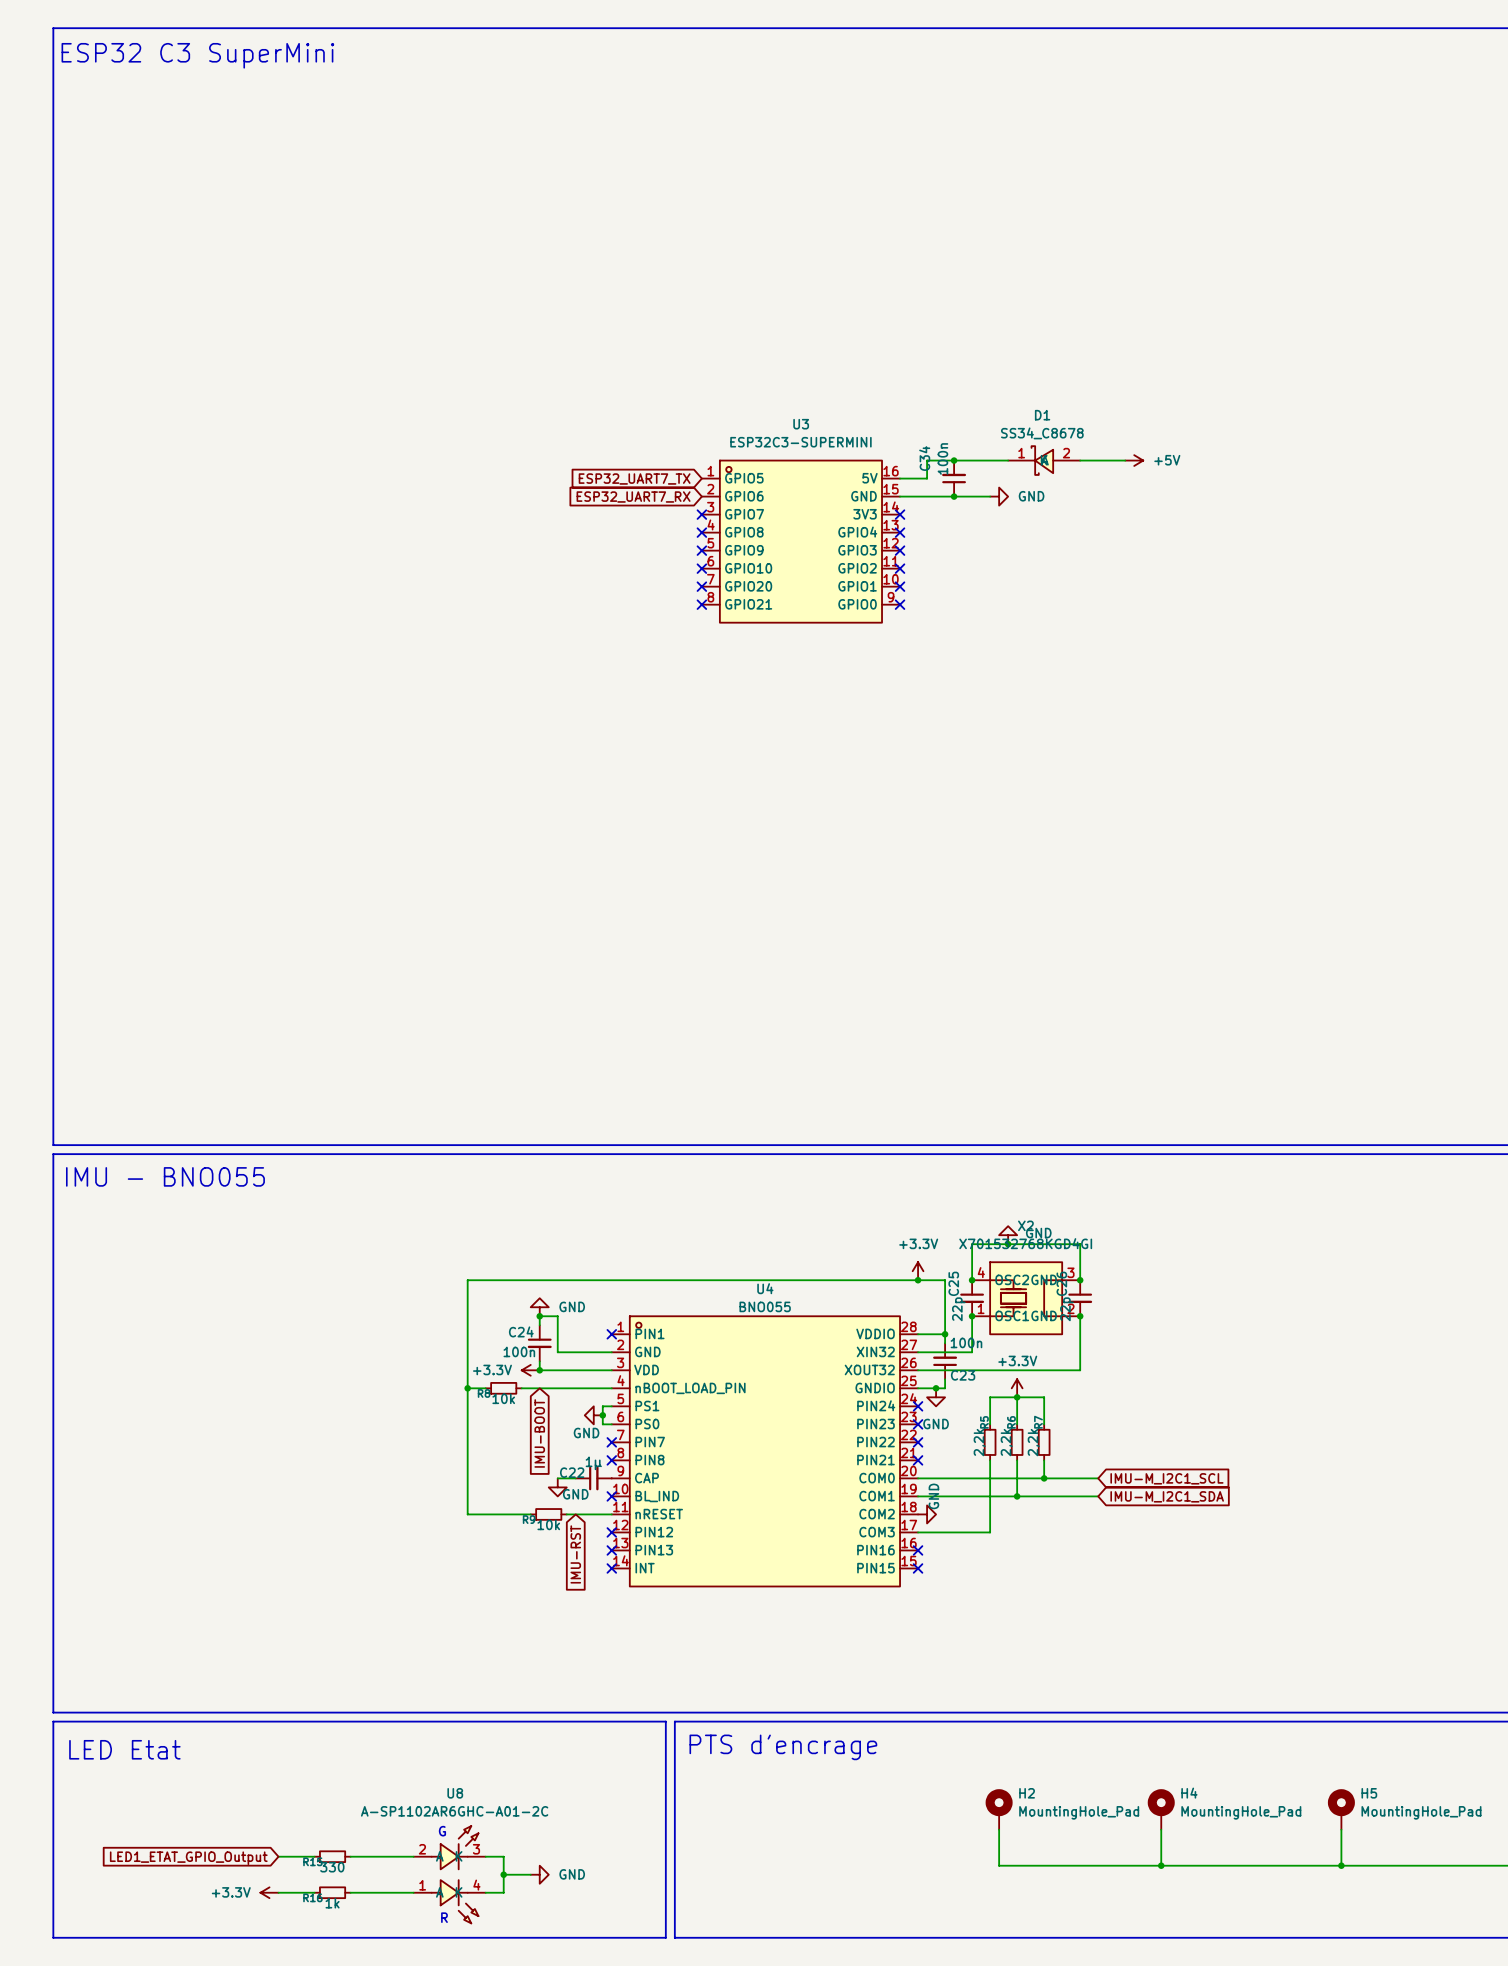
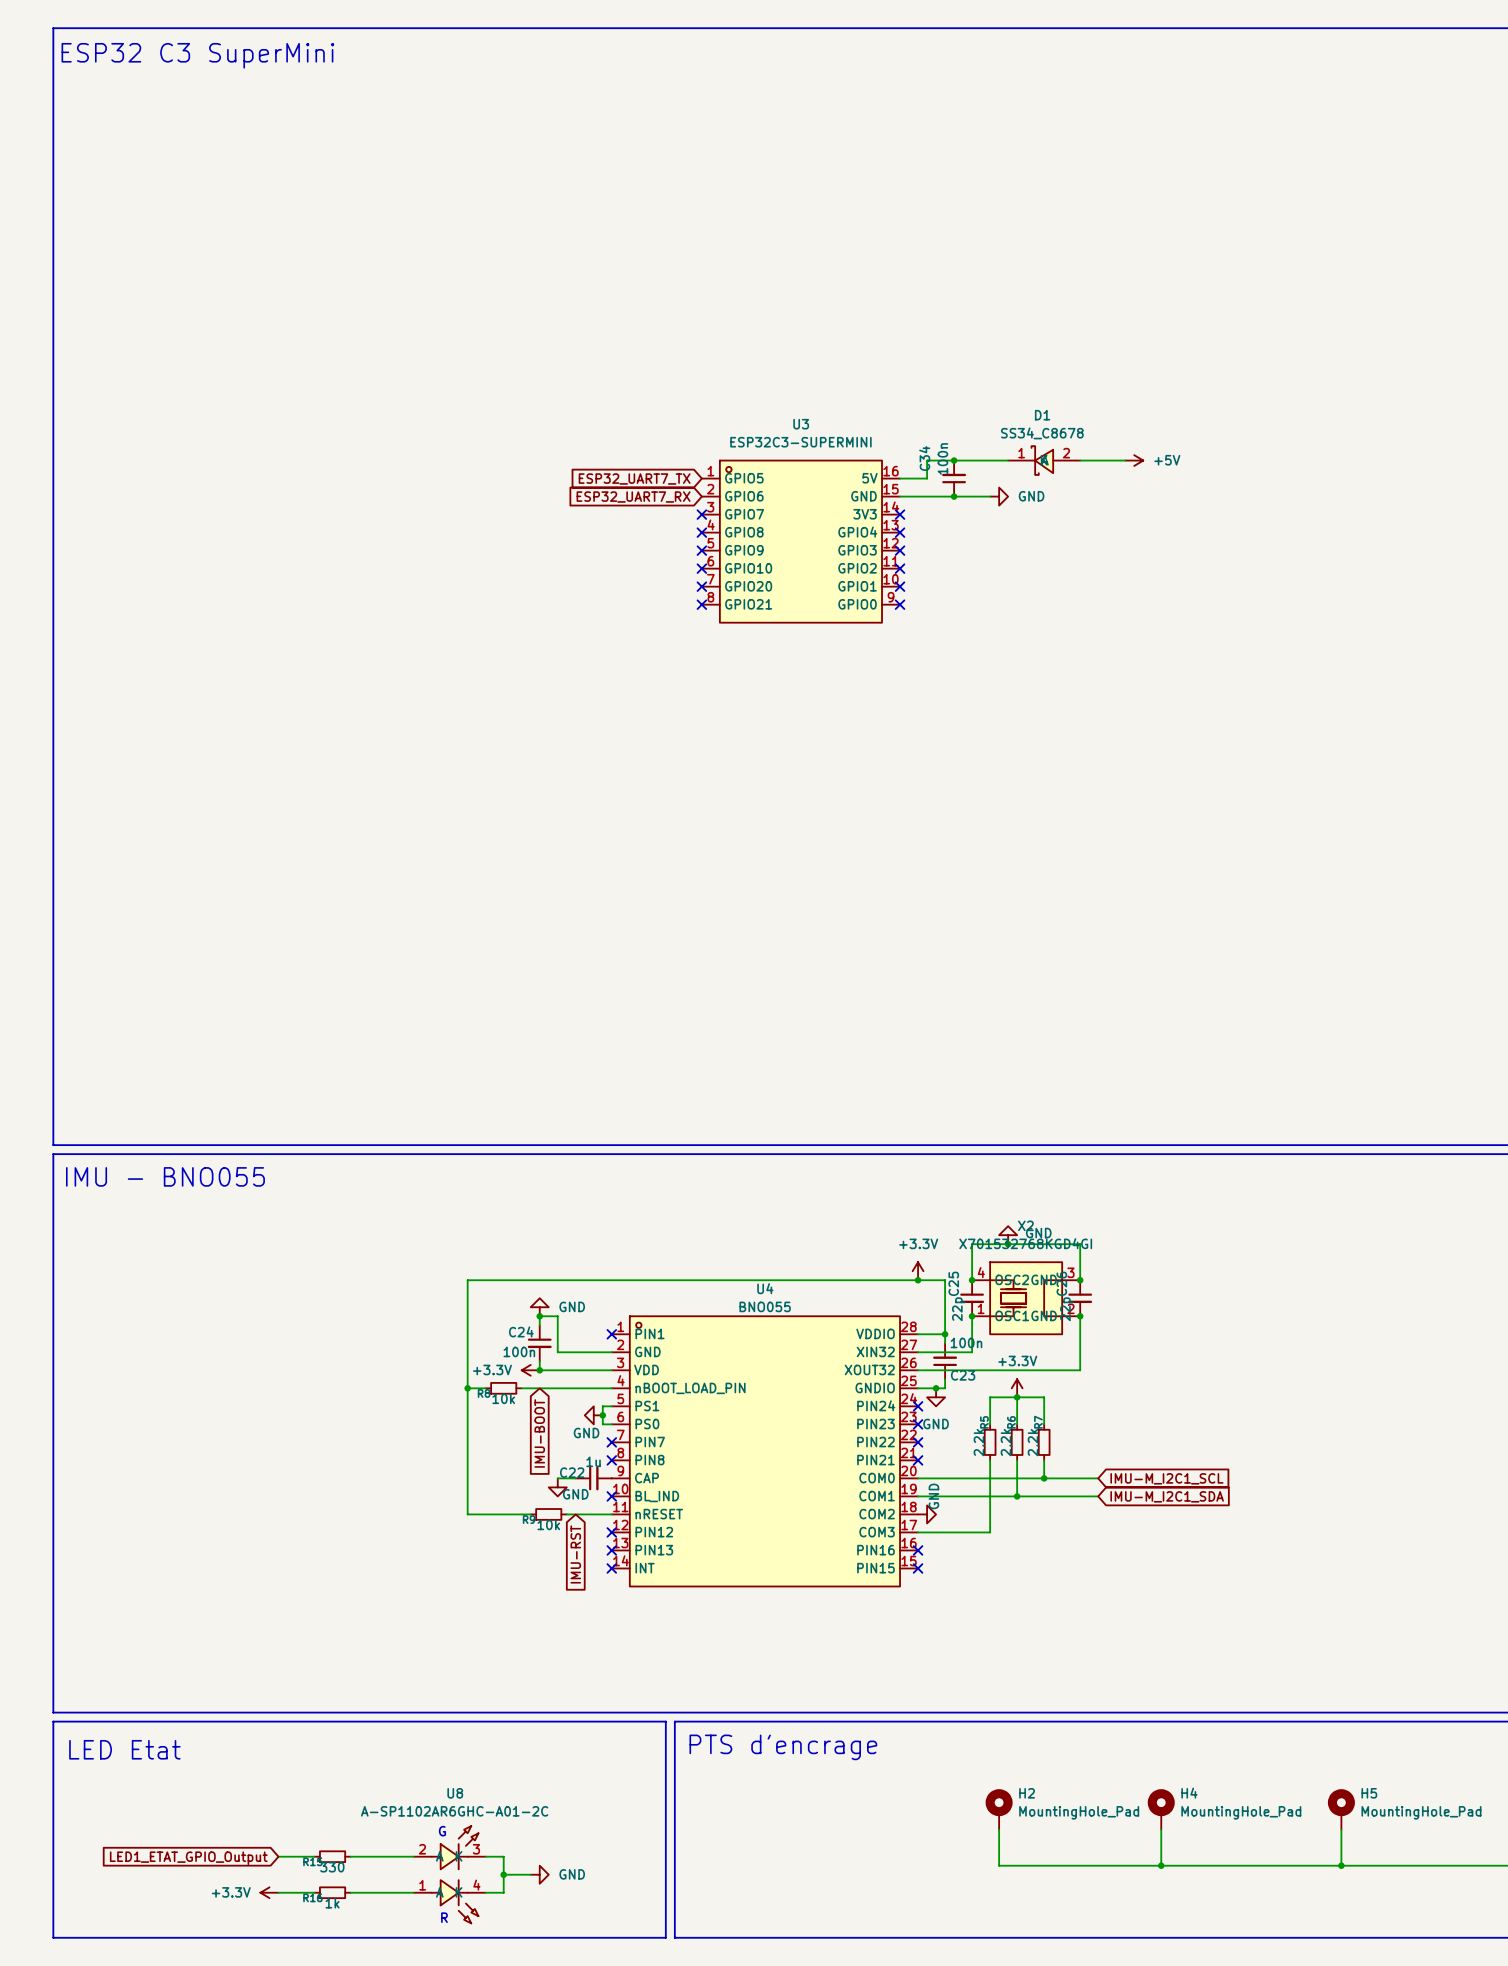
C22 value: 1µ (593, 1463) -> 1u (593, 1461)

